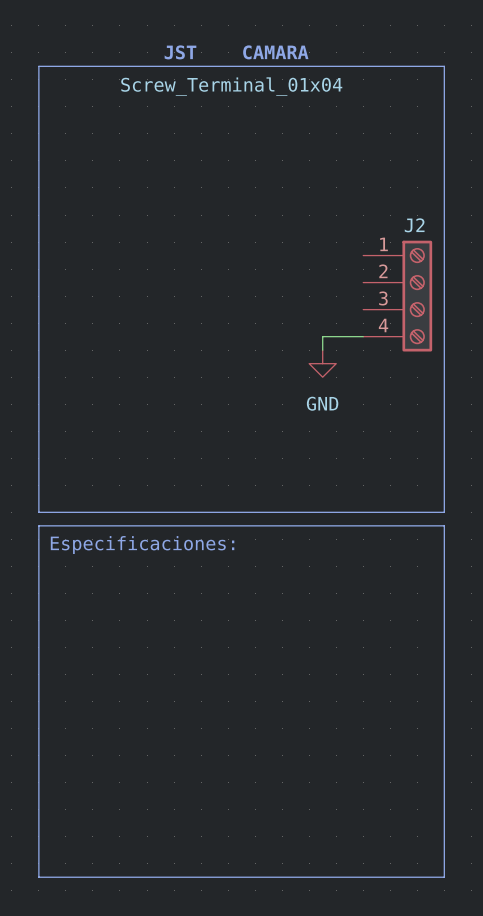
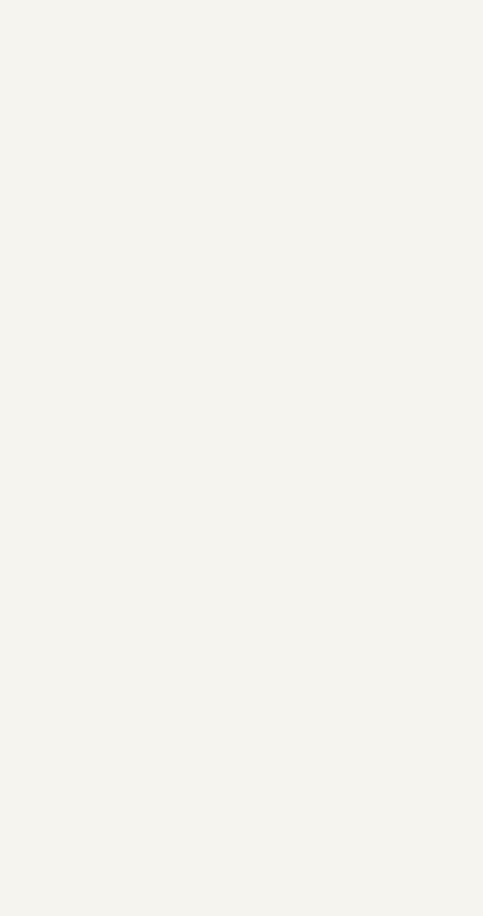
text: JST CAMARA (236, 52) -> none
line: (38, 66) (444, 66) (444, 512) (38, 512) (38, 66) -> none
J2: Screw_Terminal_01x04 (397, 296) -> none
wire: (363, 336) (322, 336) (322, 350) -> none
power symbol: GND (322, 363) -> none
line: (38, 525) (38, 877) (444, 877) (444, 525) (38, 525) -> none
text: Especificaciones: (142, 545) -> none

